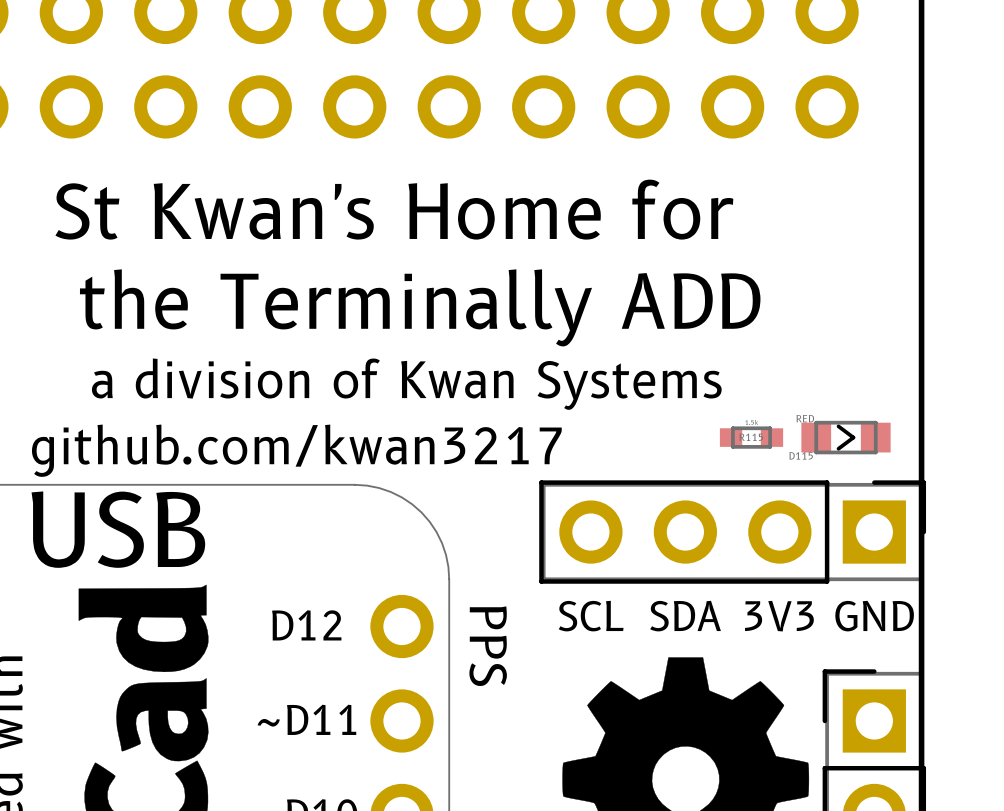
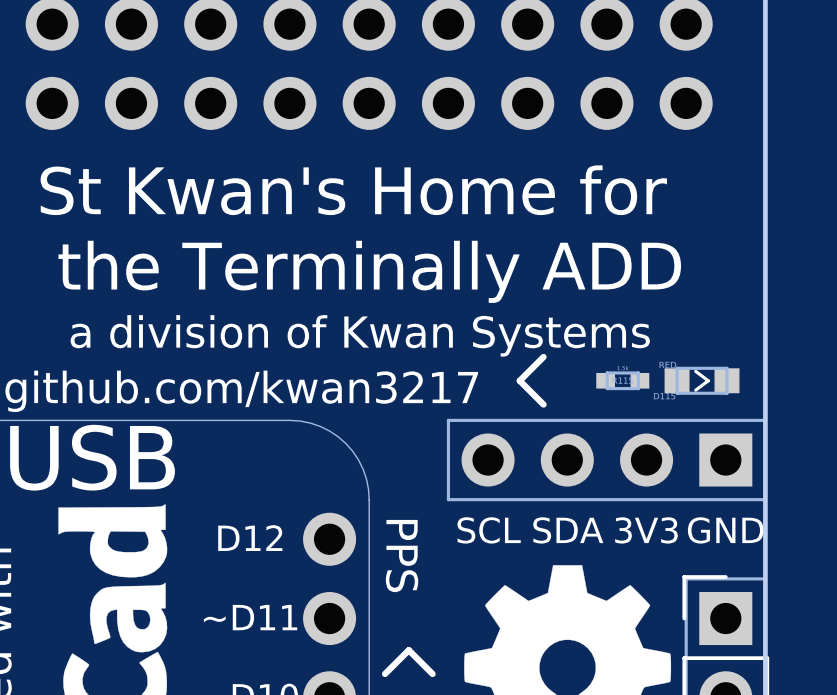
line: none -> (543, 357) (519, 380) (543, 404)
part footprint: [539, 480, 927, 584] -> [446, 418, 767, 502]
line: none -> (385, 673) (408, 650) (432, 673)

